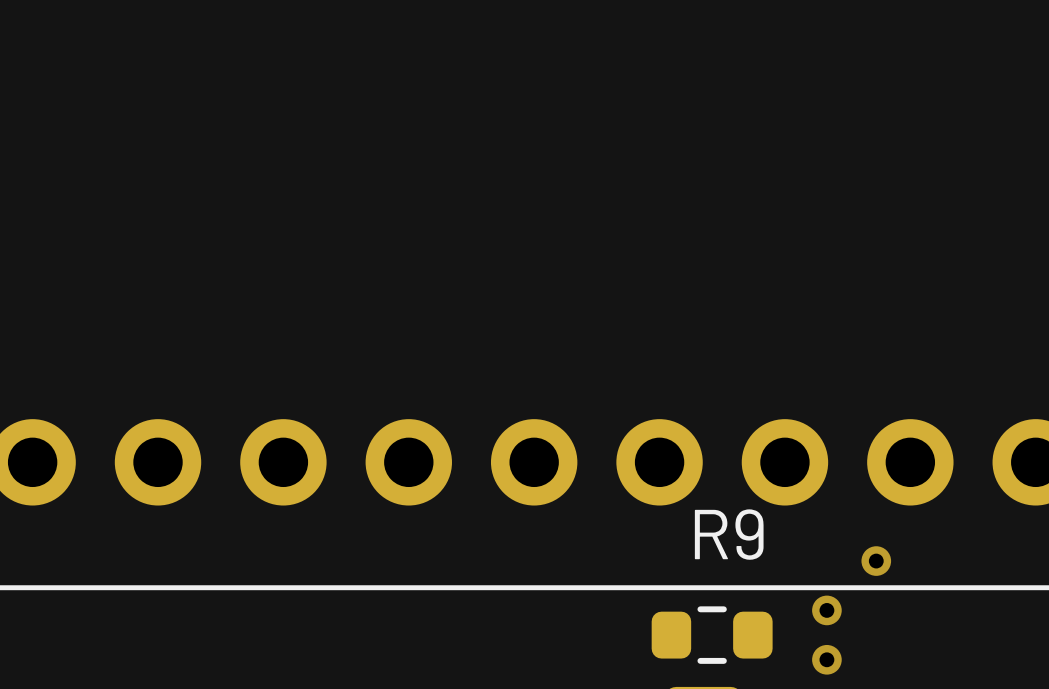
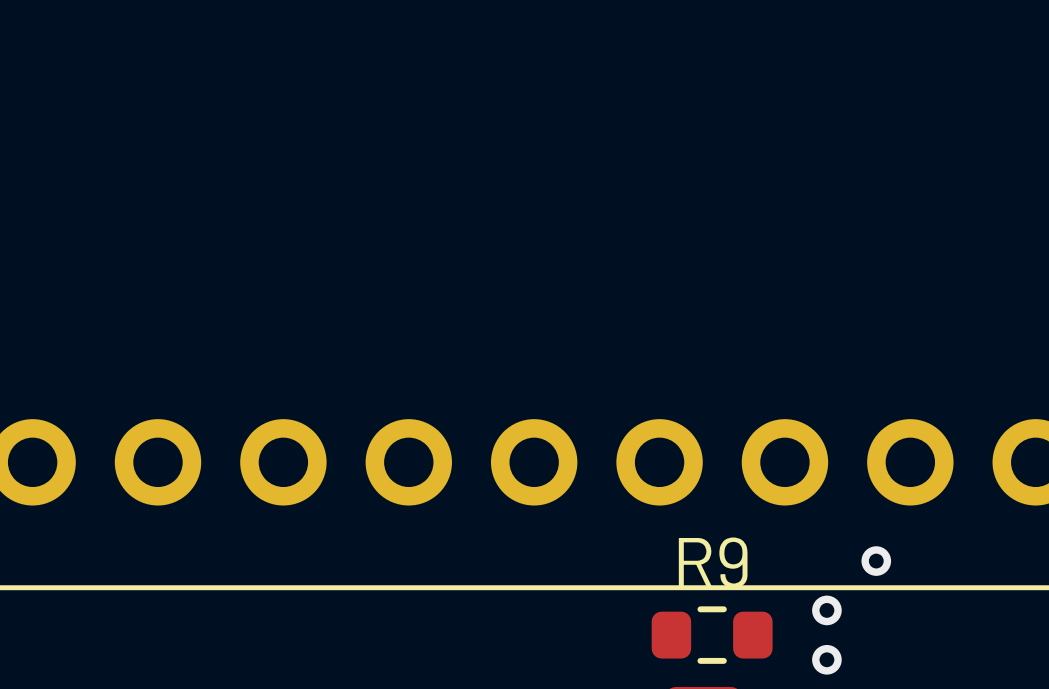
R9 name position: R9 (729, 534) -> R9 (713, 562)

